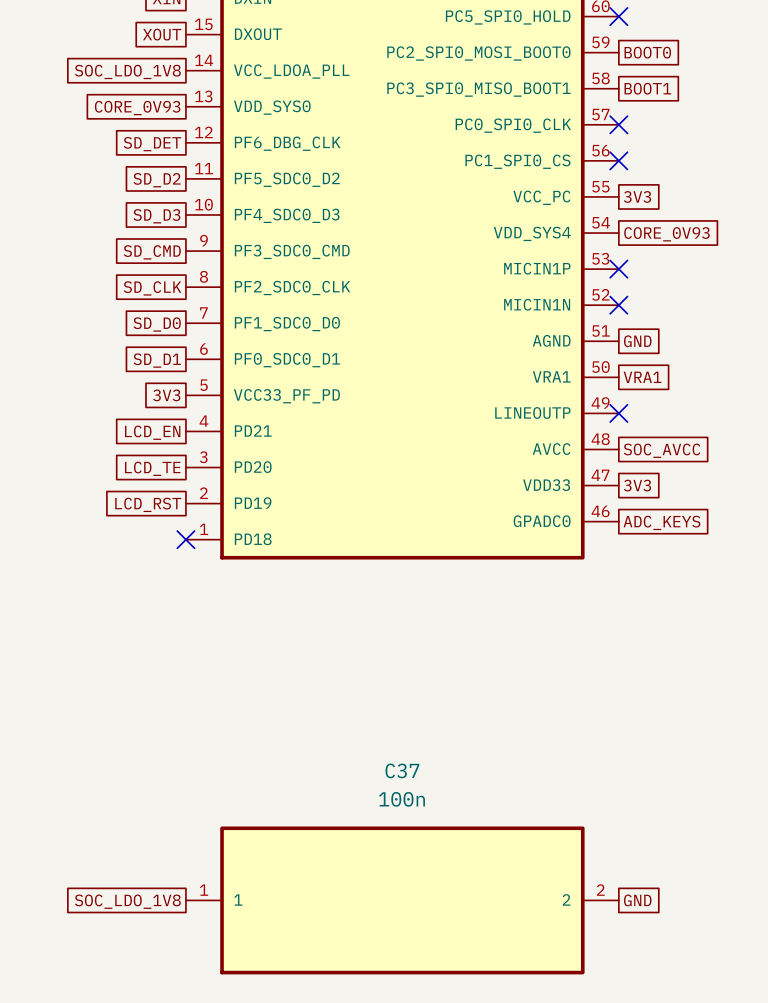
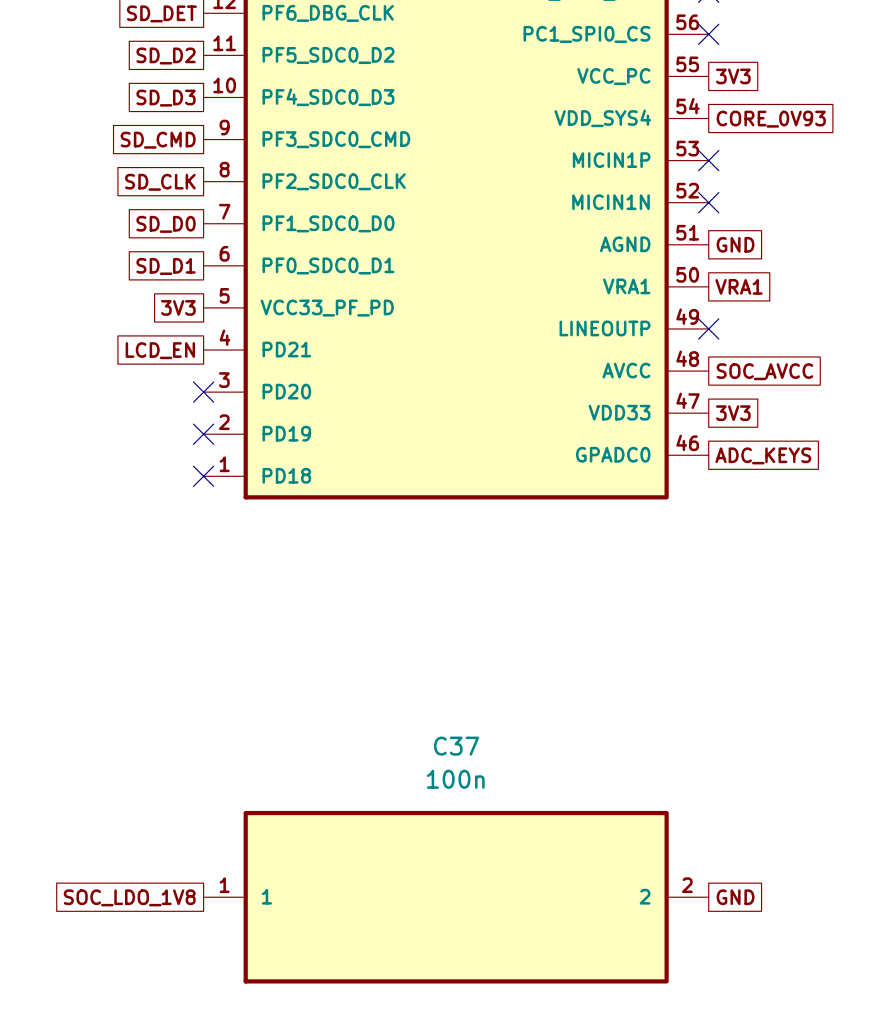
no-connect mark: none -> (203, 392)
global label: LCD_TE (152, 468) -> none
no-connect mark: none -> (203, 434)
global label: LCD_RST (148, 504) -> none

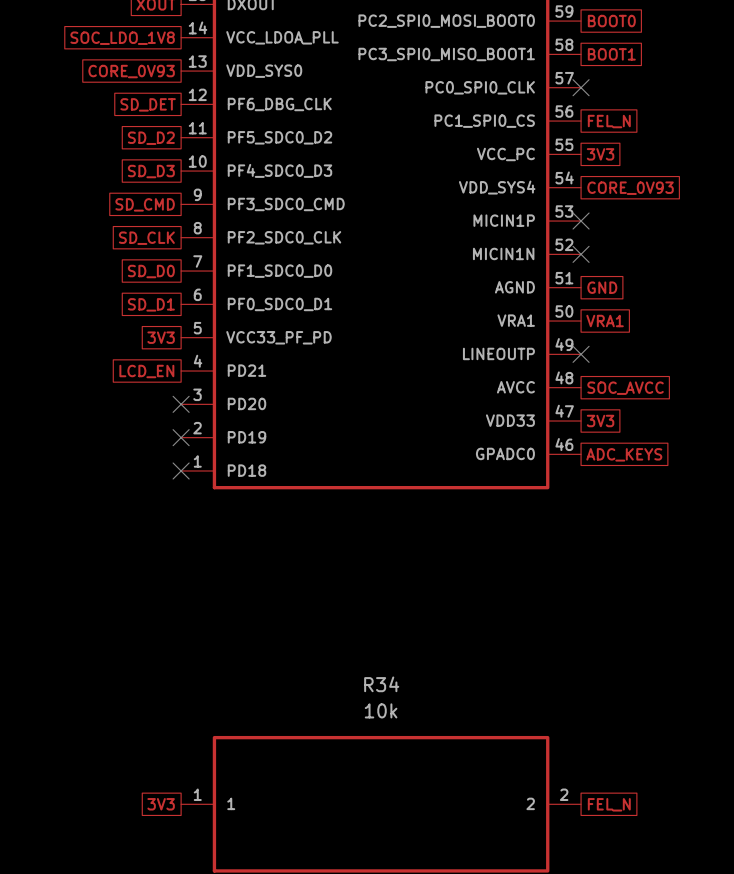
no-connect mark: (708, 34) -> none
global label: none -> FEL_N (609, 121)
C37 name: C37 (456, 746) -> R34 (381, 684)
C37 value: 100n (455, 779) -> 10k (381, 710)
global label: SOC_LDO_1V8 (129, 897) -> 3V3 (161, 804)
global label: GND (735, 897) -> FEL_N (609, 804)

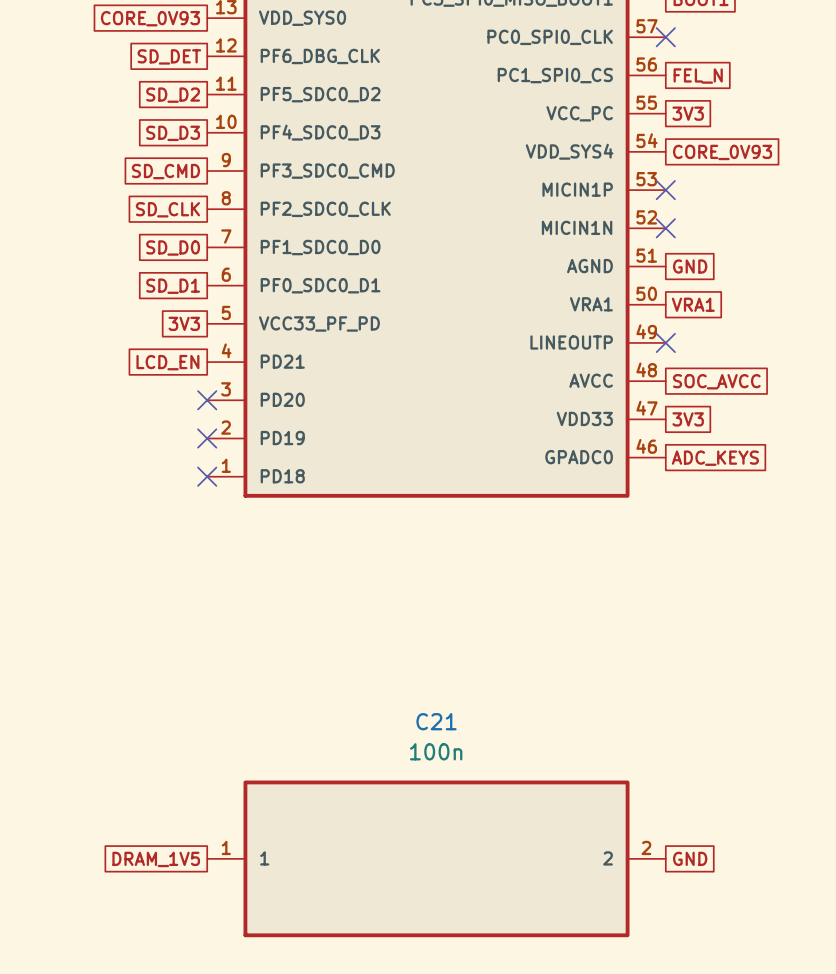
R34 name: R34 (381, 684) -> C21 (436, 721)
R34 value: 10k (381, 710) -> 100n (436, 751)
global label: 3V3 (161, 804) -> DRAM_1V5 (156, 859)
global label: FEL_N (609, 804) -> GND (690, 858)

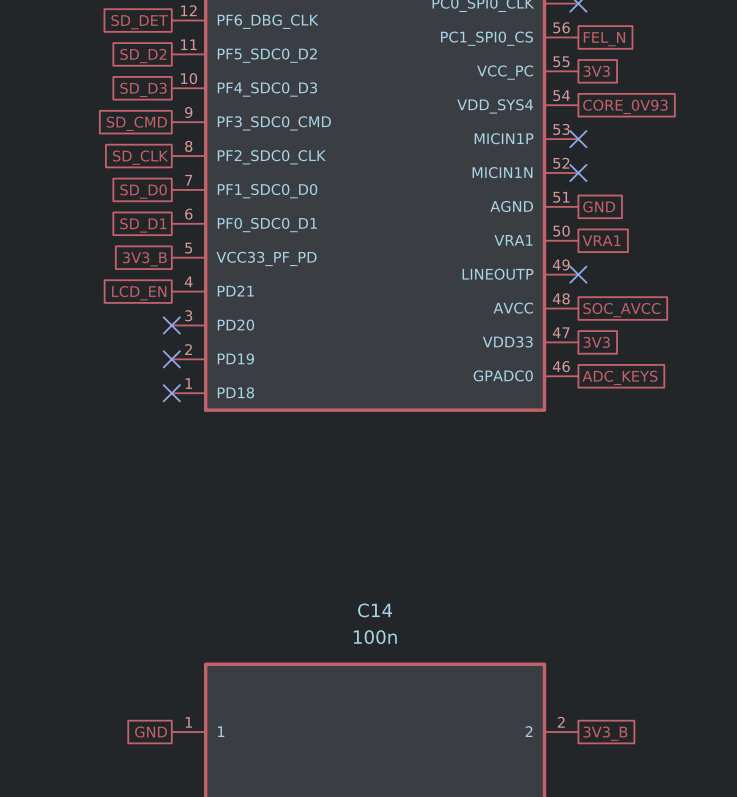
global label: 3V3 (184, 323) -> 3V3_B (144, 259)
C21 name: C21 (436, 721) -> C14 (375, 610)
global label: GND (690, 858) -> 3V3_B (605, 733)
global label: DRAM_1V5 (156, 859) -> GND (151, 732)

